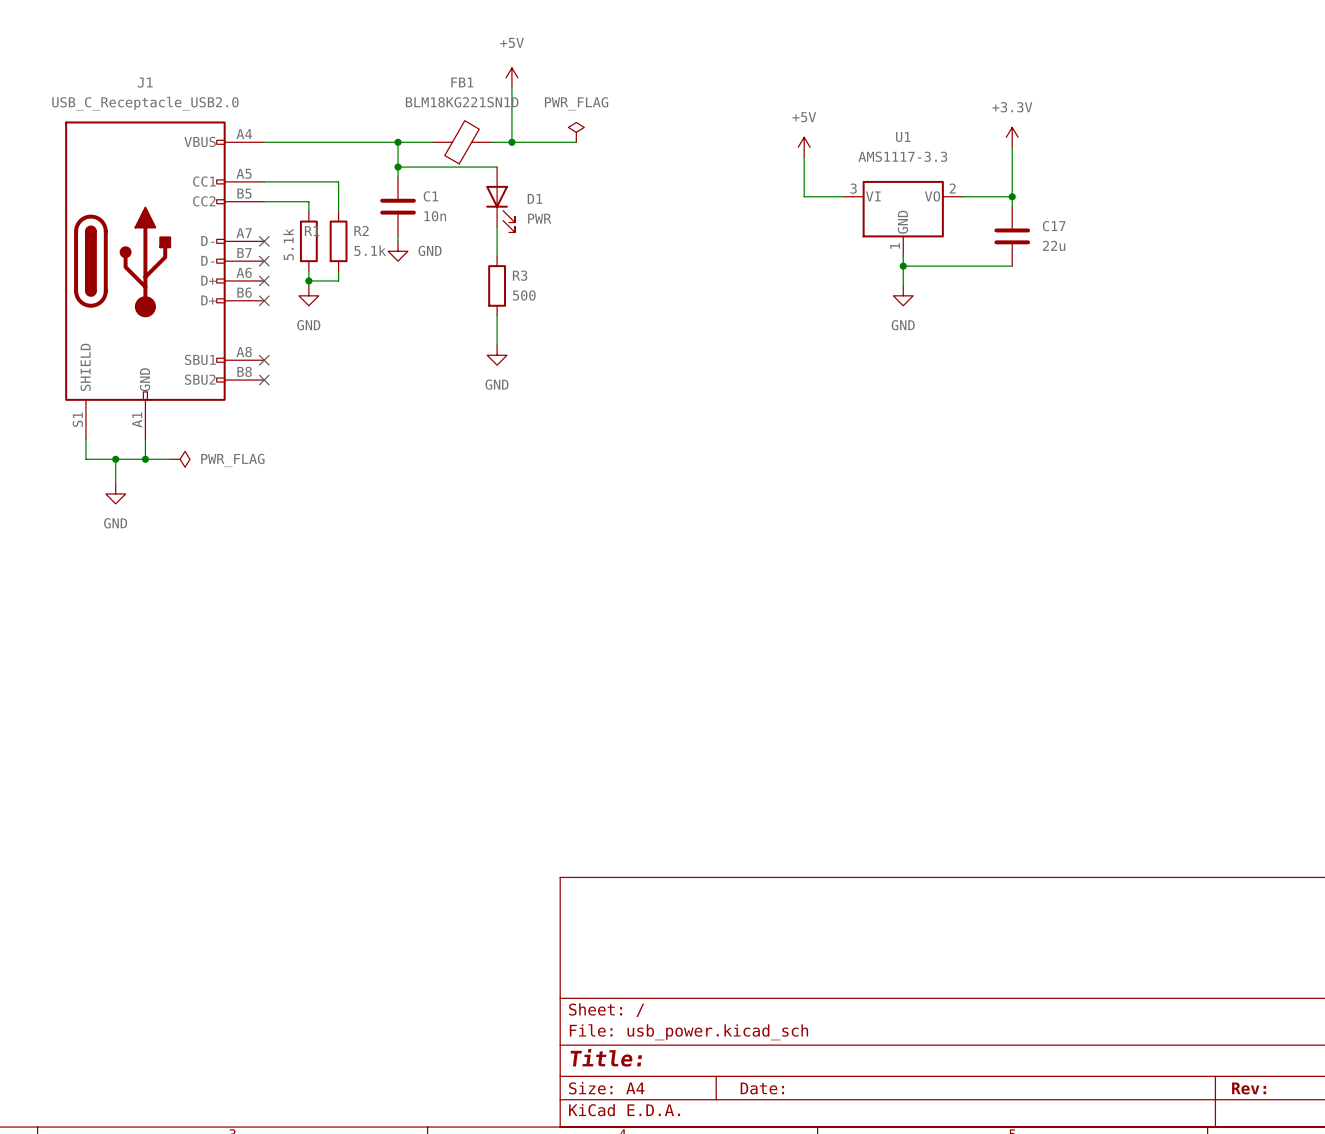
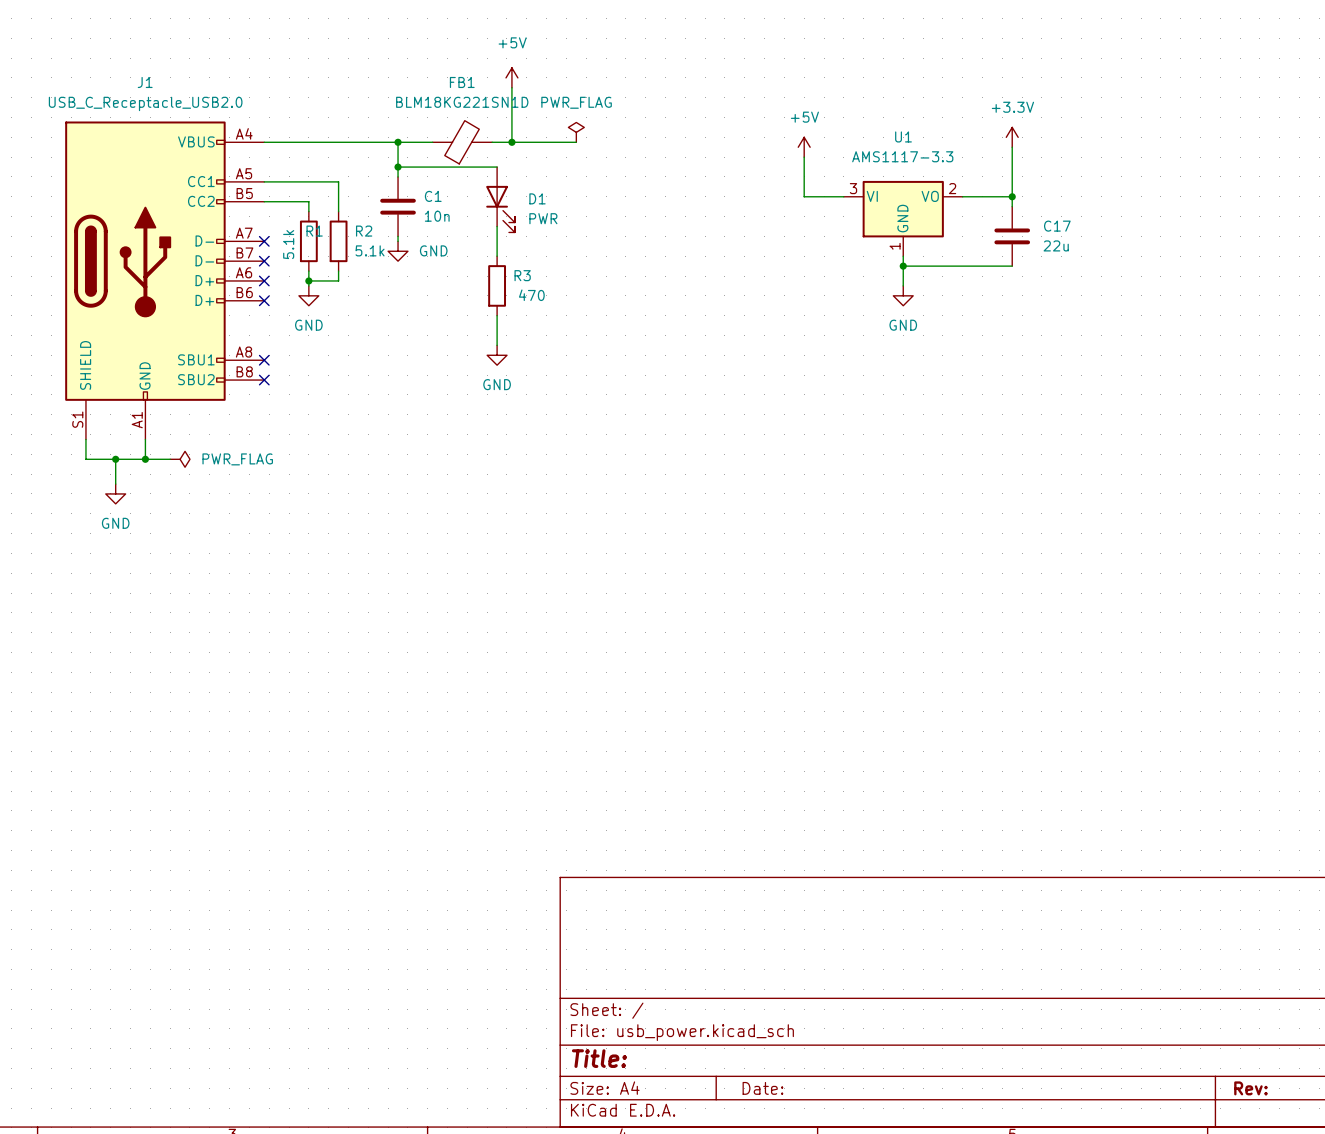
R3 value: 500 (524, 295) -> 470 (531, 295)

